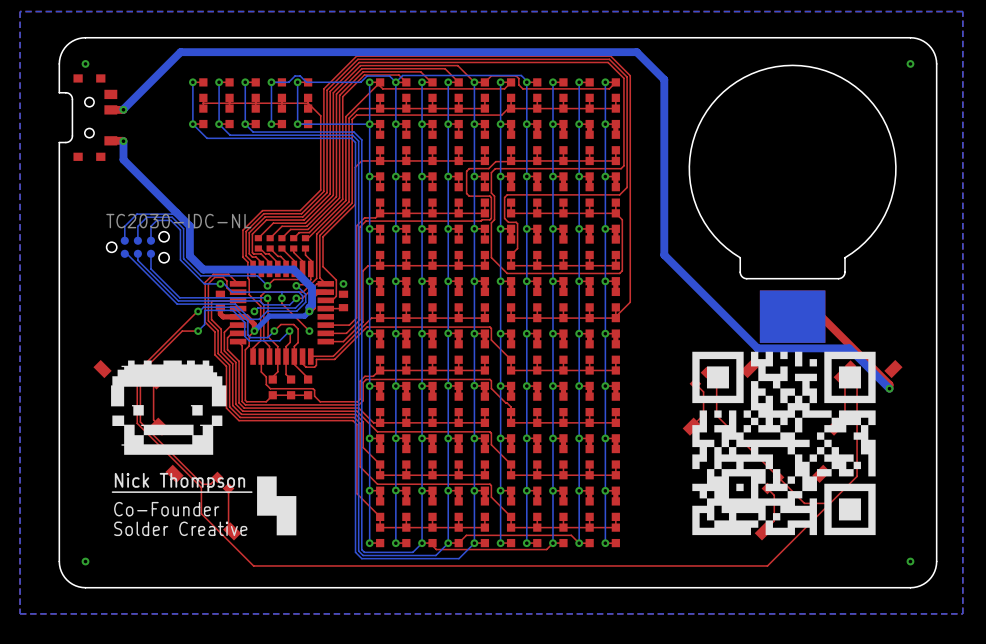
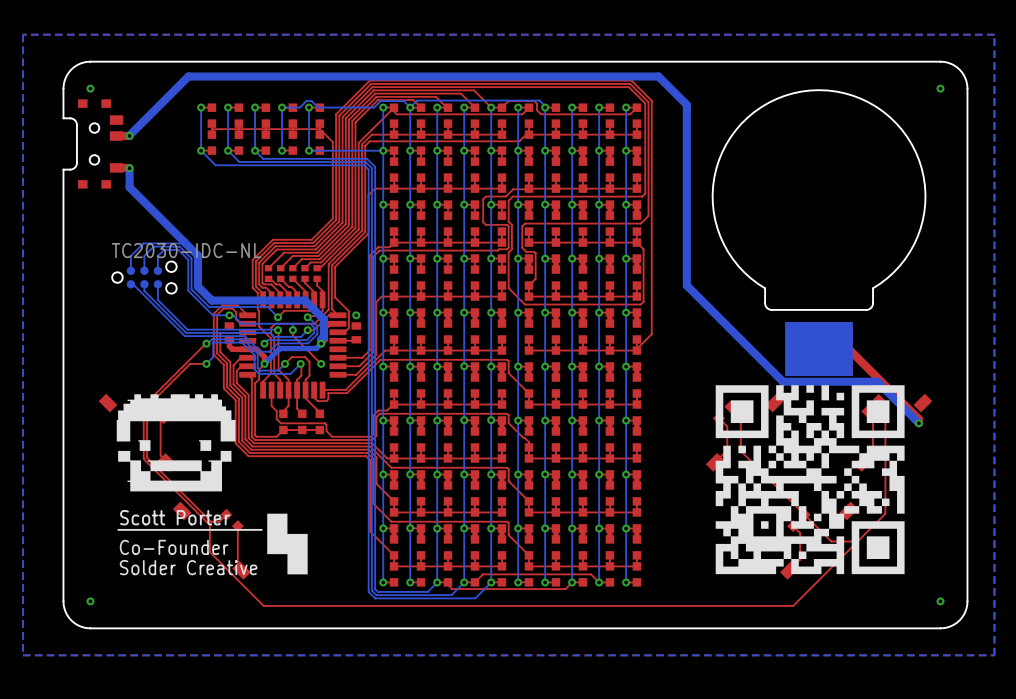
text: Nick Thompson (179, 482) -> Scott Porter (175, 517)

